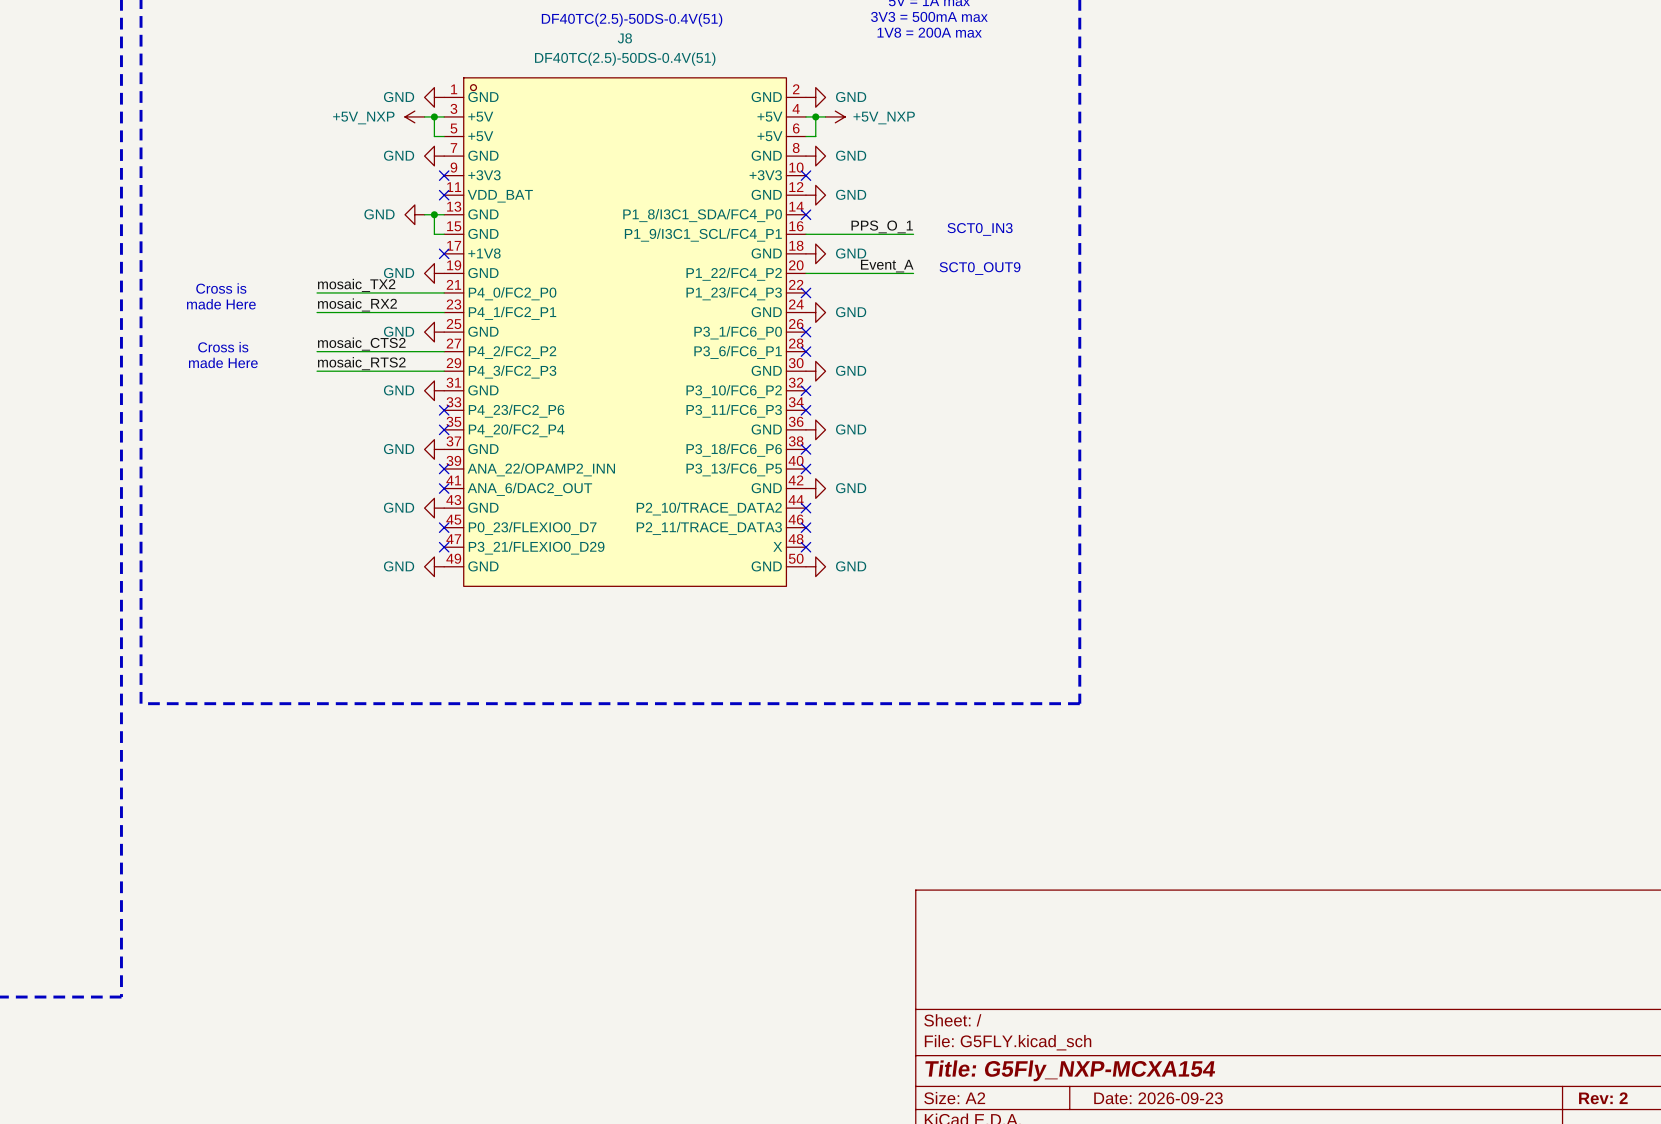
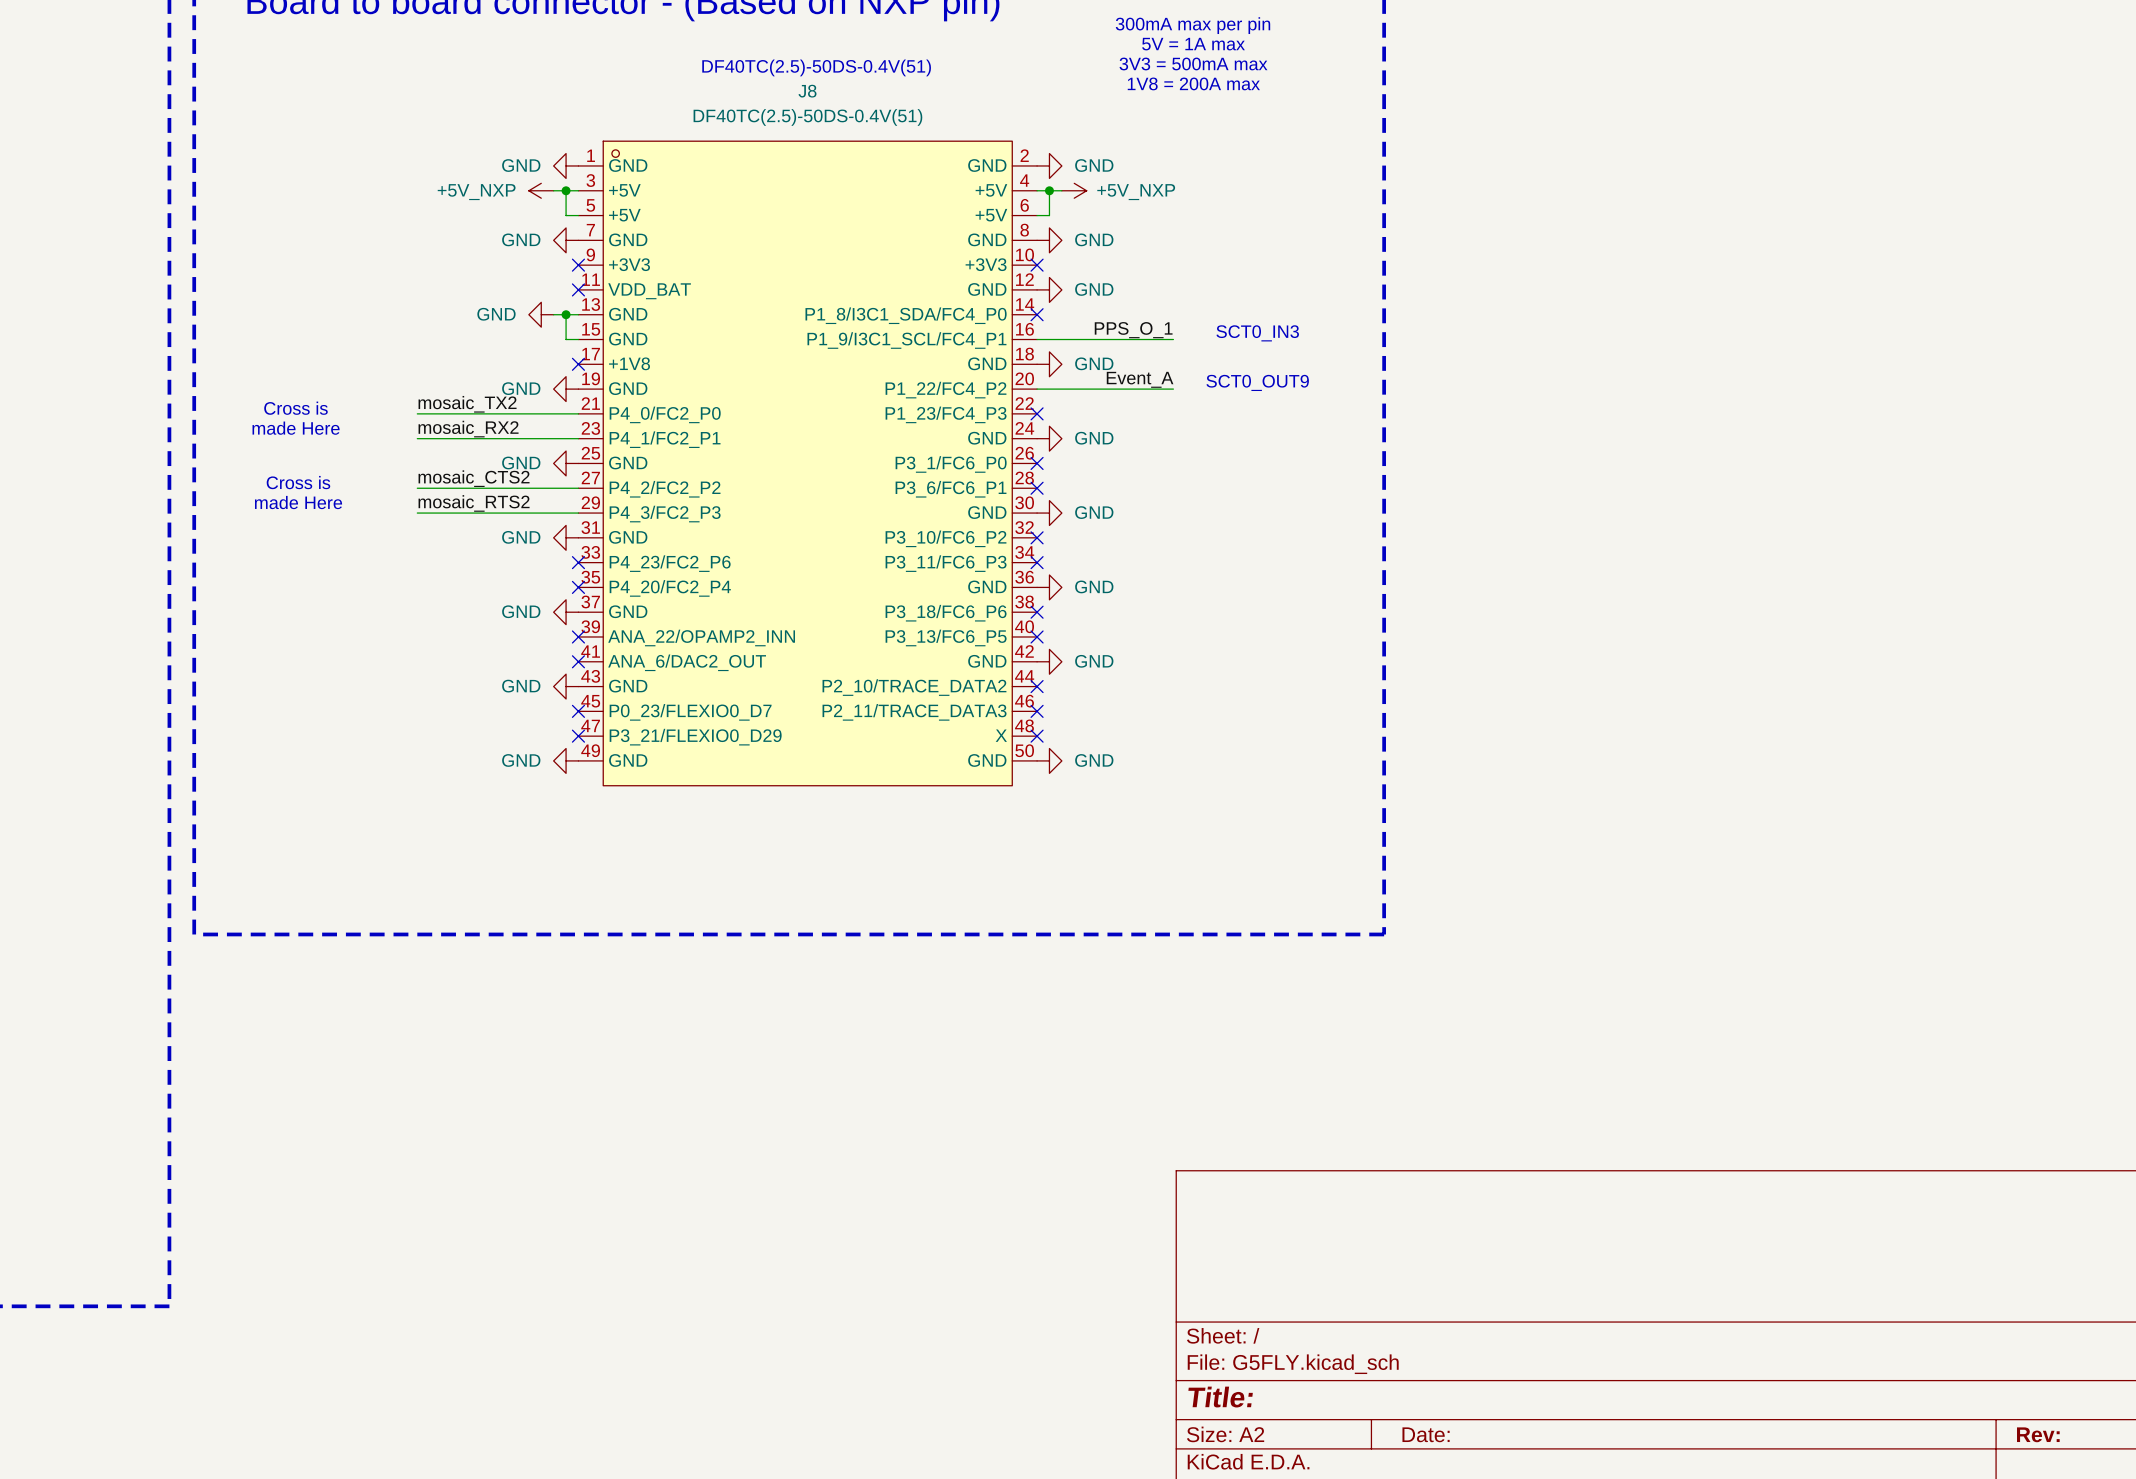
title block: Title: G5Fly_NXP-MCXA154 (1070, 1070) -> Title: (1220, 1397)
title block: Date: 2026-09-23 (1158, 1098) -> Date: (1426, 1434)
title block: Rev: 2 (1603, 1098) -> Rev: (2038, 1434)

